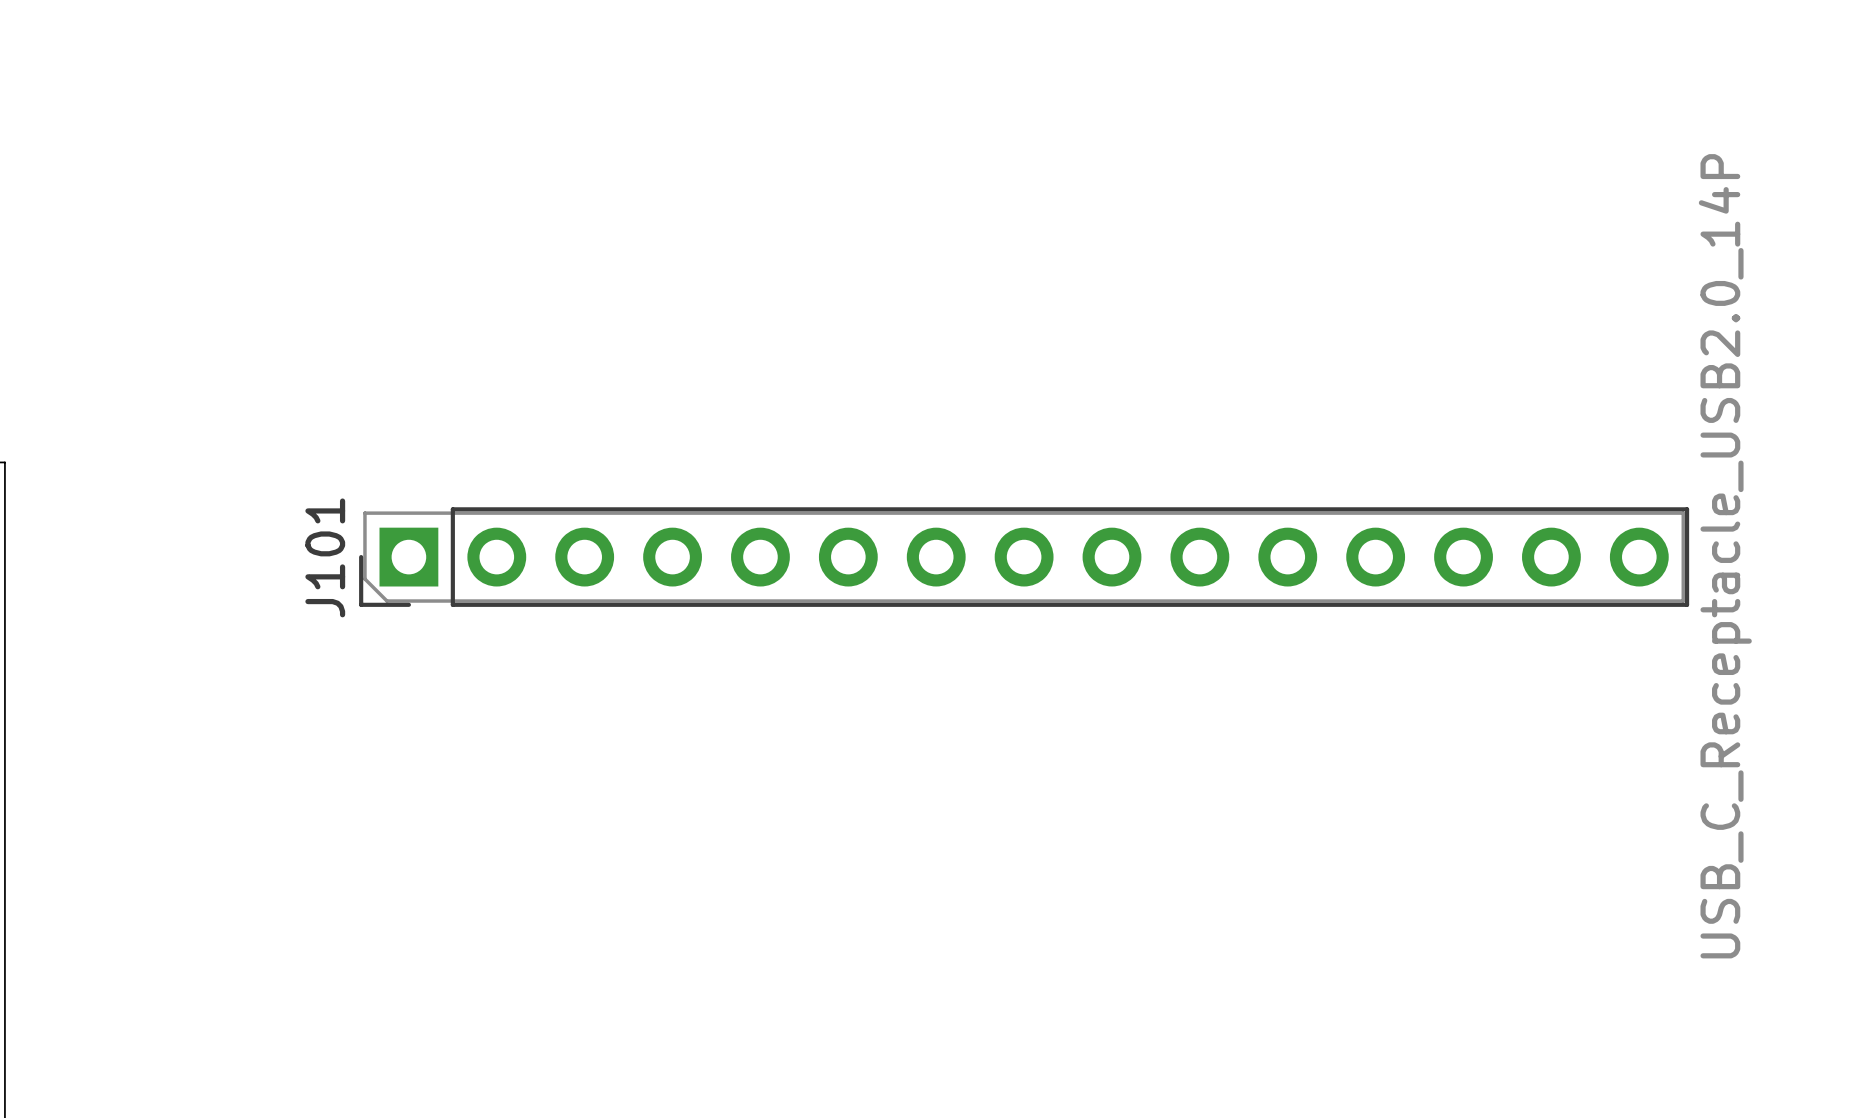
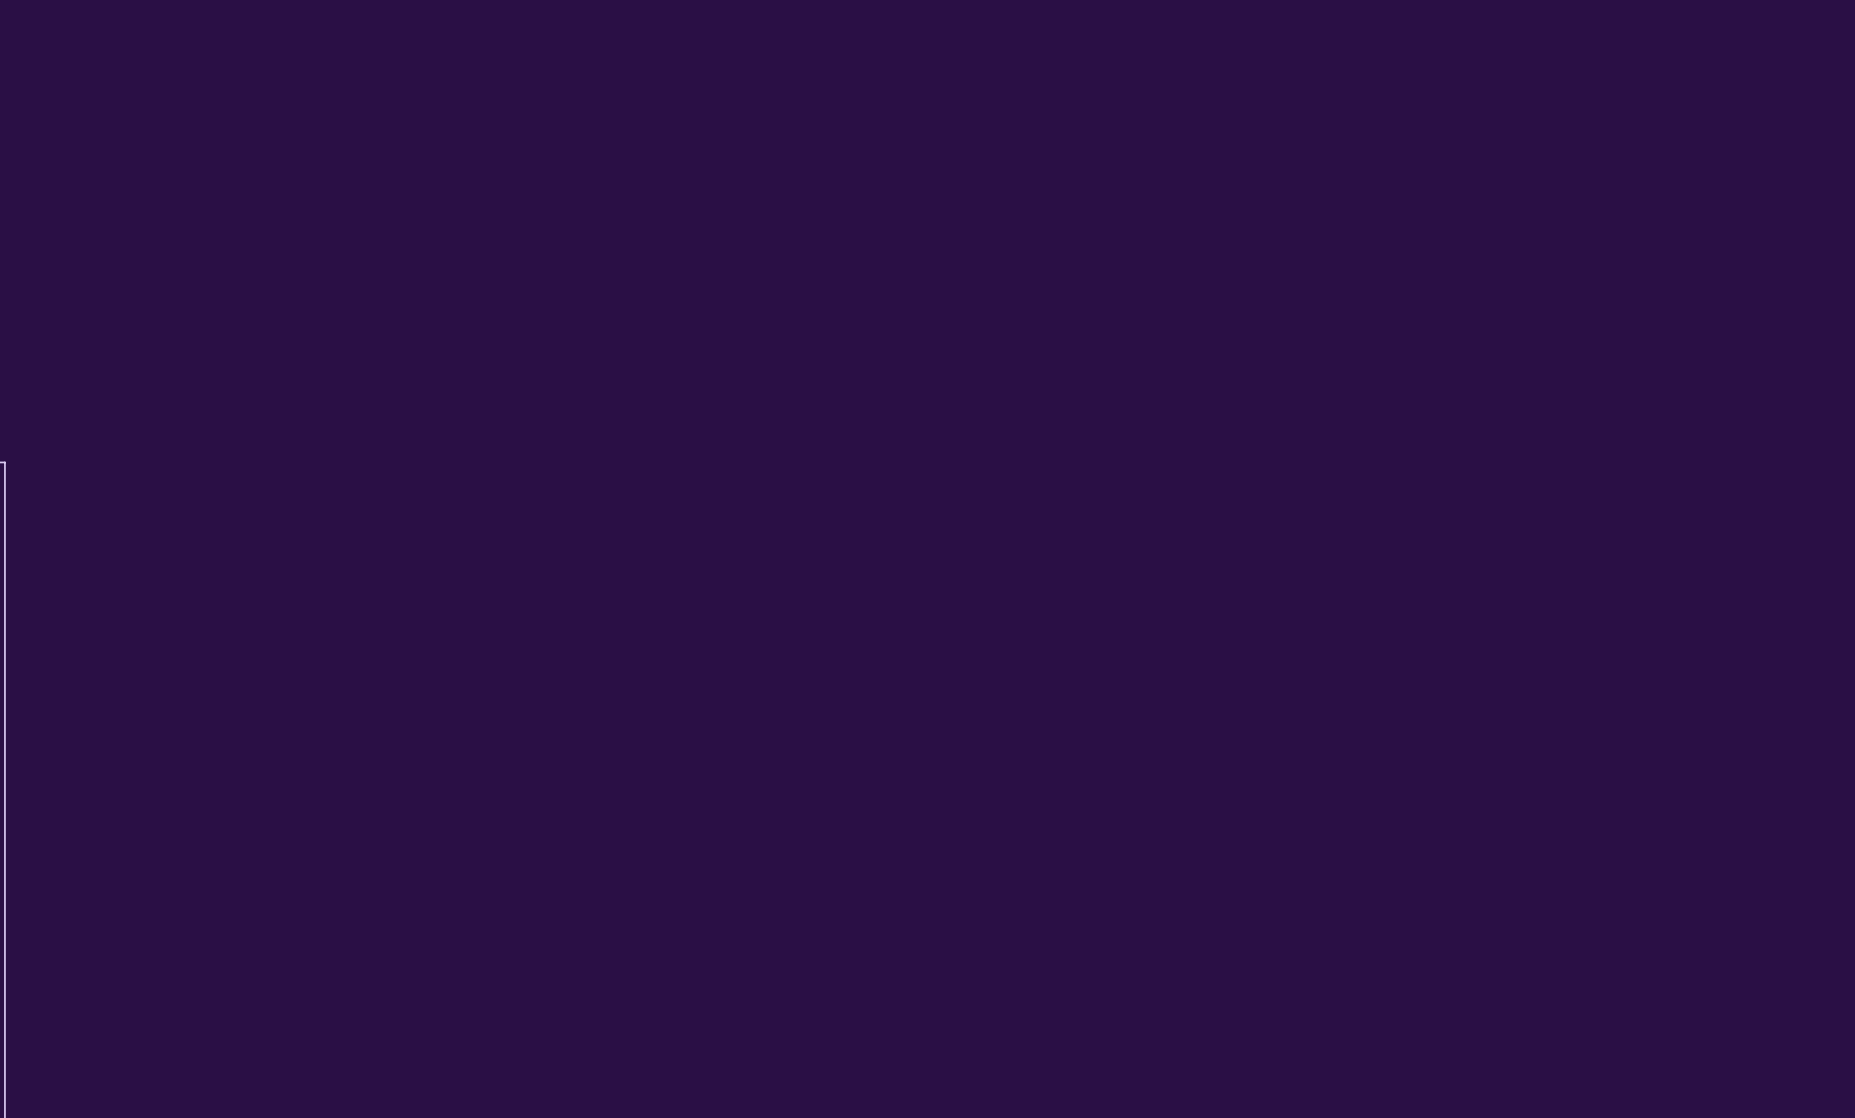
J101: USB_C_Receptacle_USB2.0_14P (1024, 557) -> none

